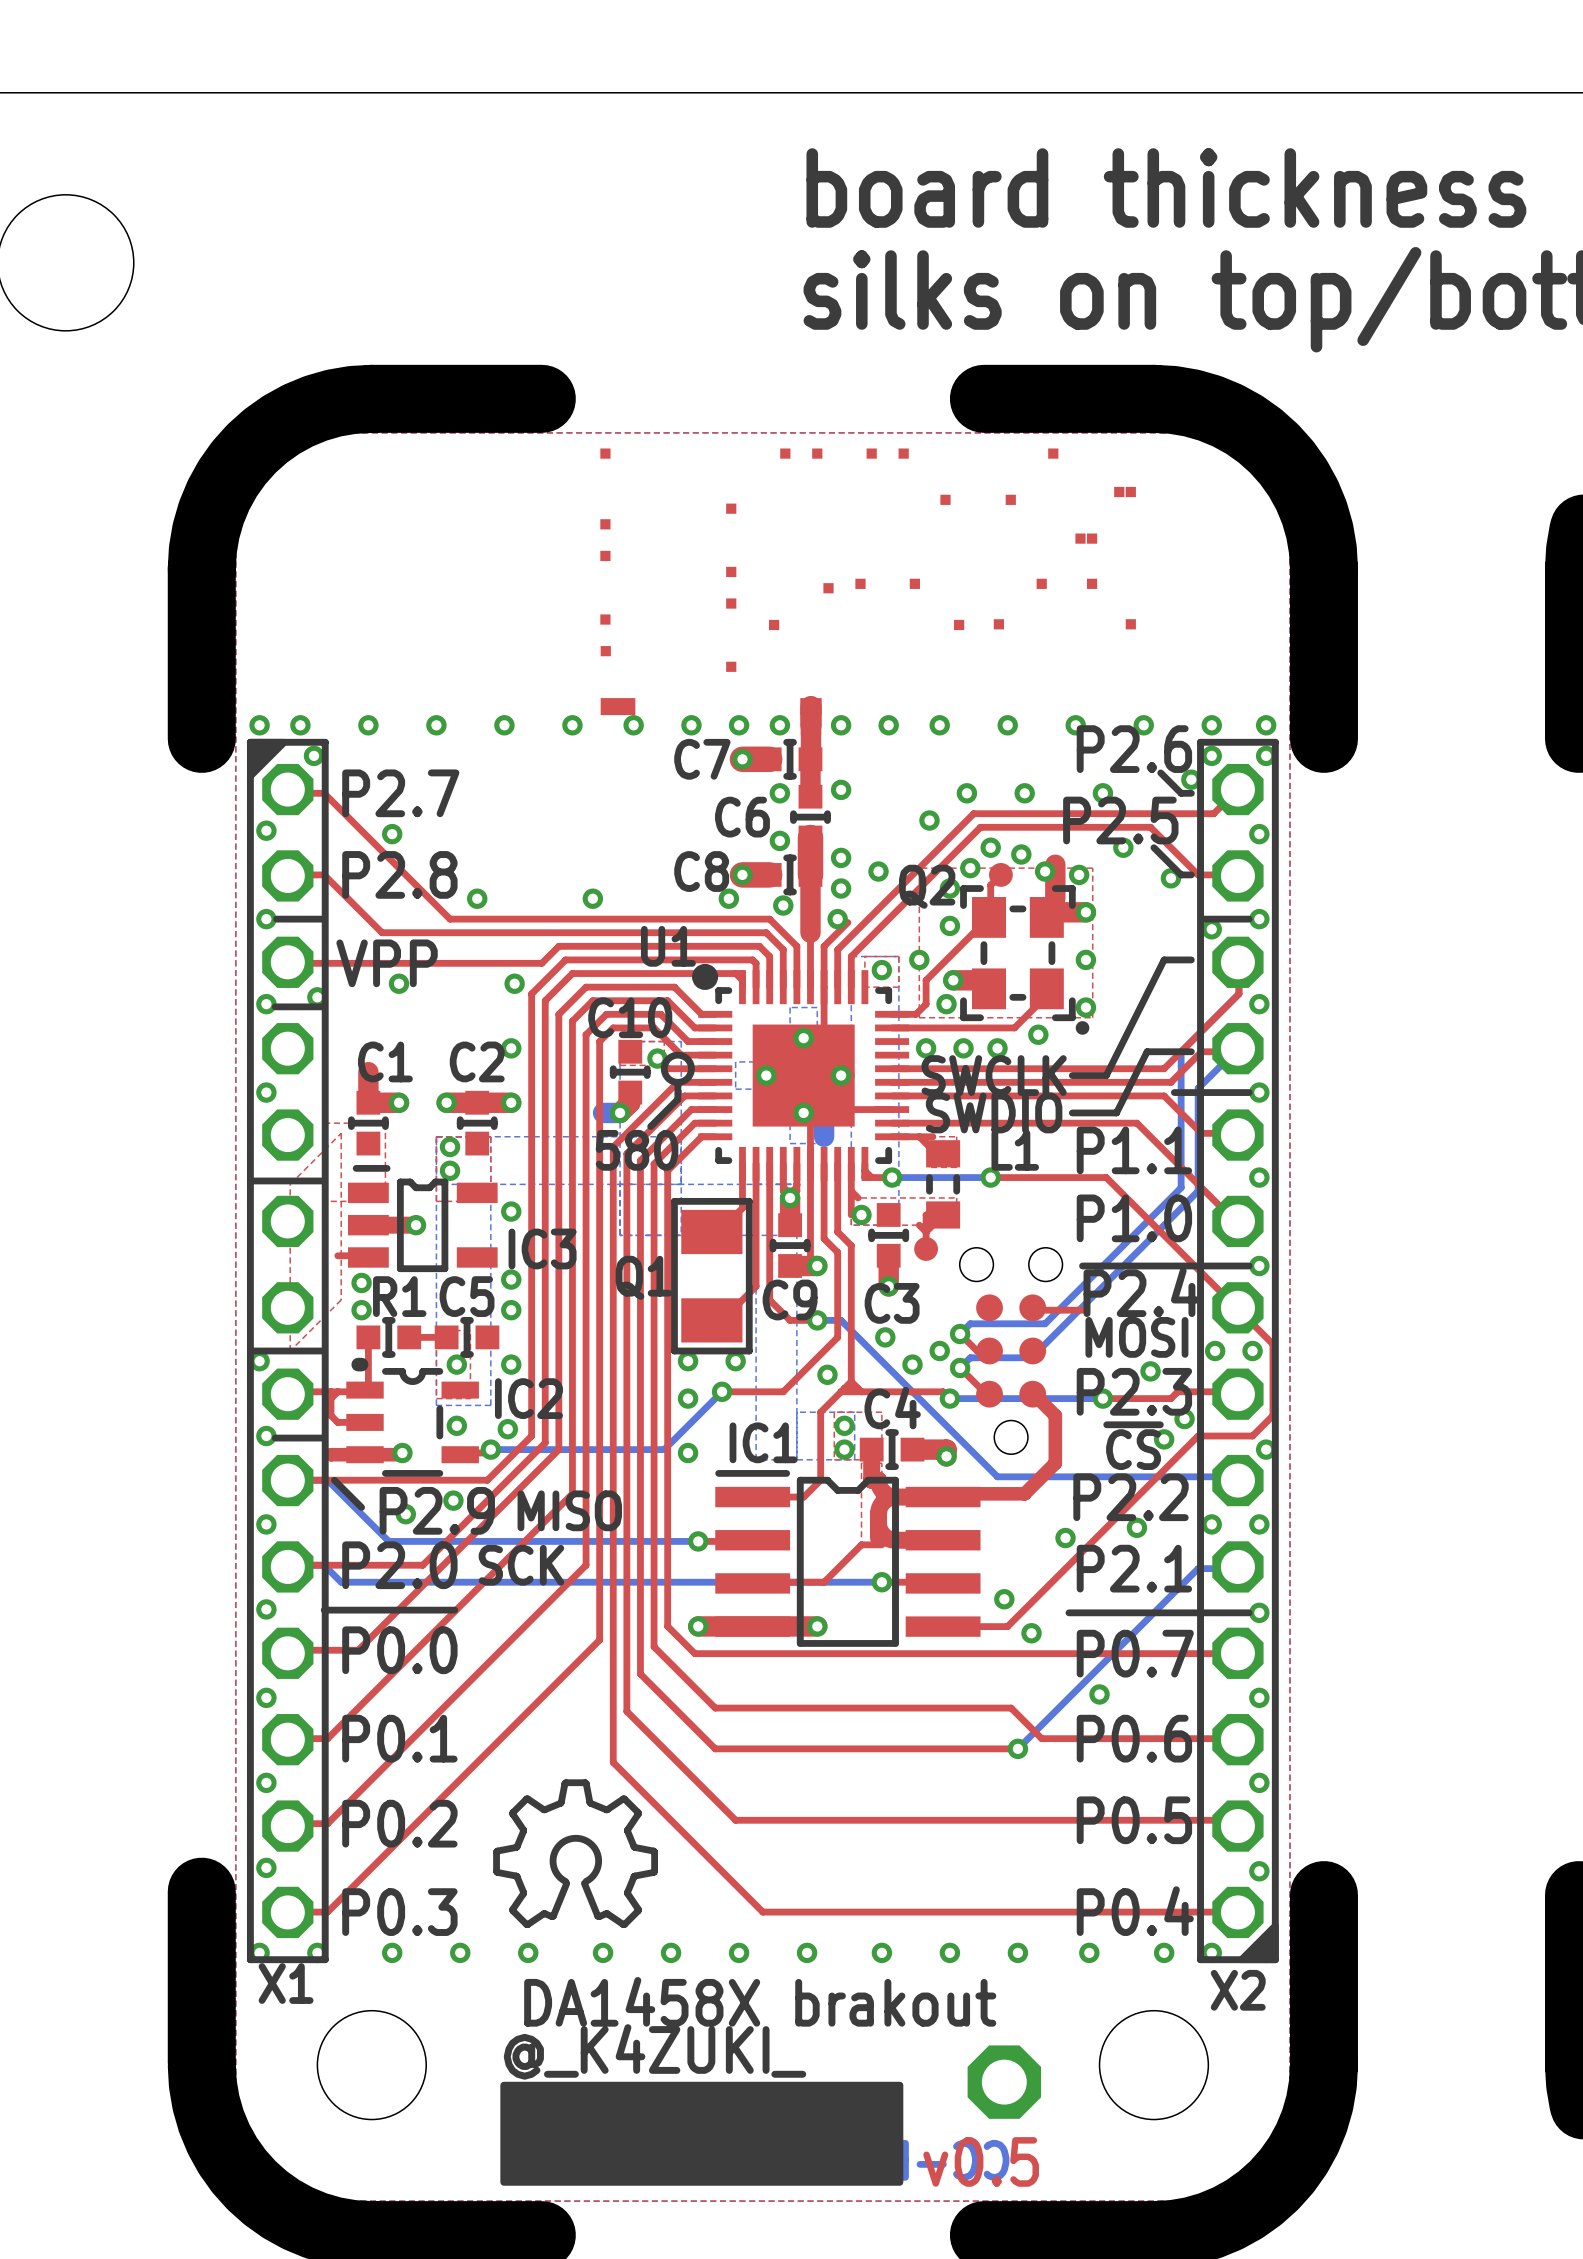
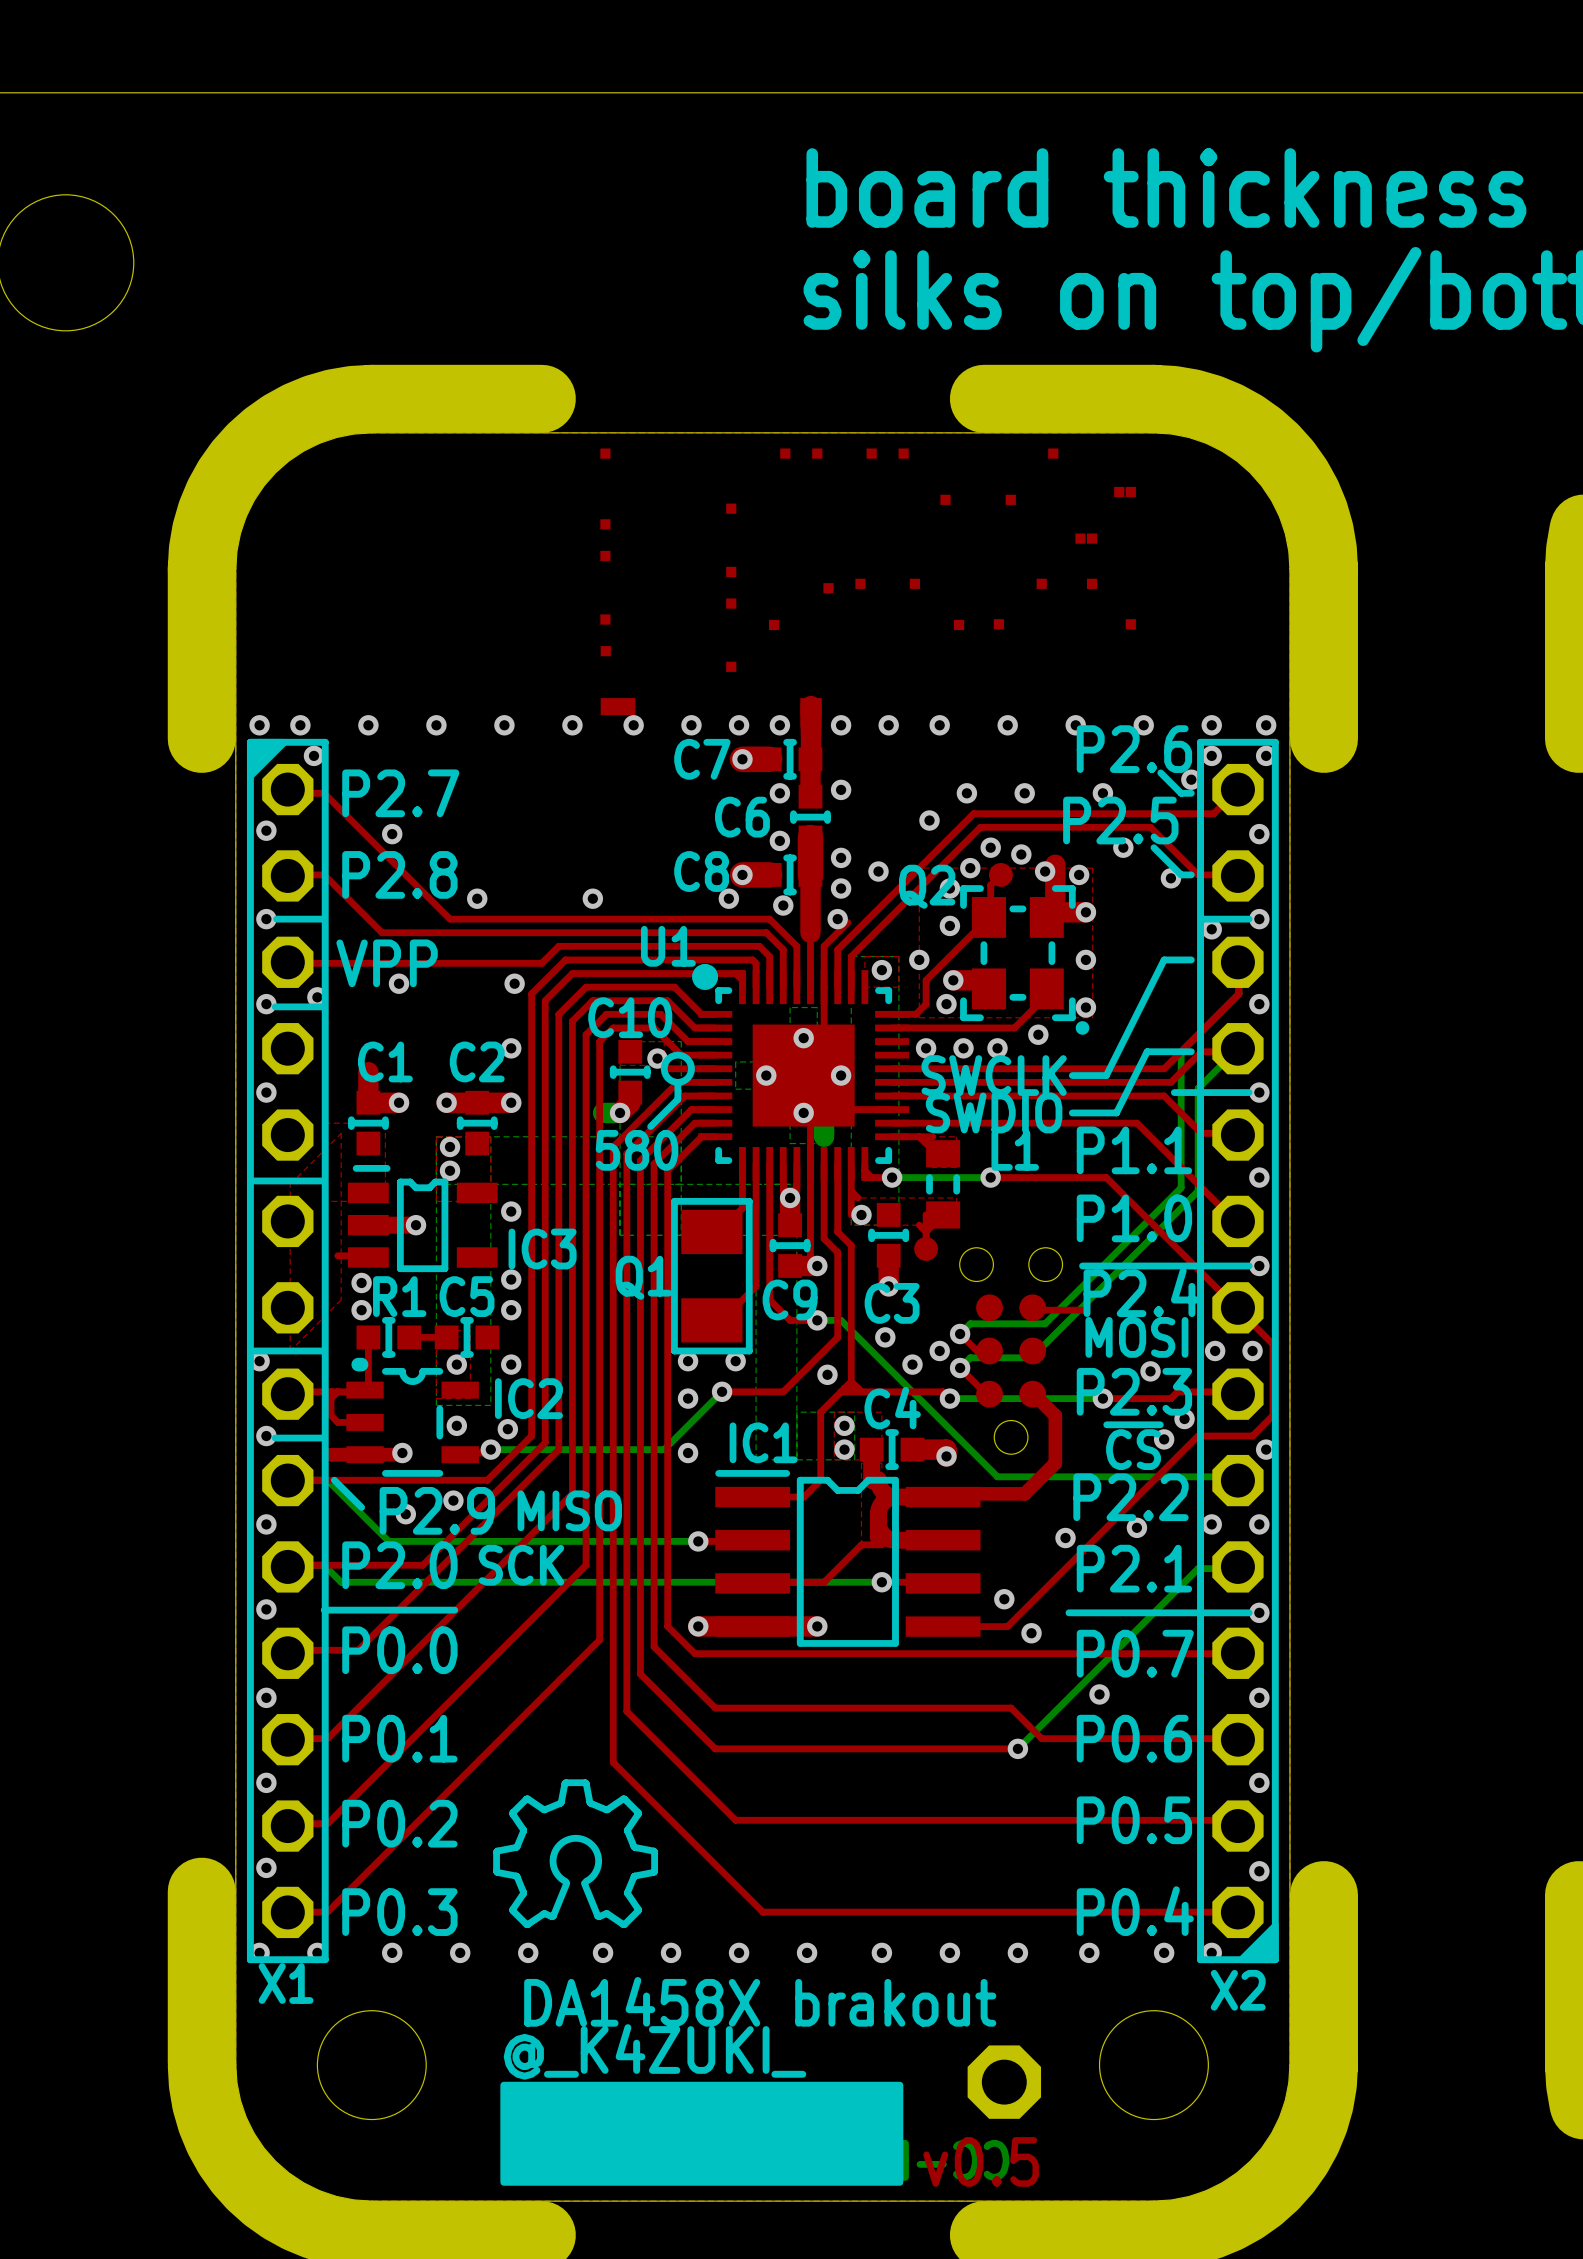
board edge: none -> (371, 432) (1171, 434) (1205, 443) (1236, 460) (1261, 486) (1279, 516) (1288, 551) (1289, 568) (1289, 2065) (1285, 2100) (1271, 2133) (1250, 2161) (1236, 2173) (1205, 2190) (1171, 2199) (1153, 2201) (354, 2199) (319, 2190) (289, 2173) (263, 2147) (246, 2117) (236, 2082) (235, 2065) (236, 551) (240, 533) (254, 500) (275, 472) (303, 451) (319, 443) (354, 434) (371, 432)

